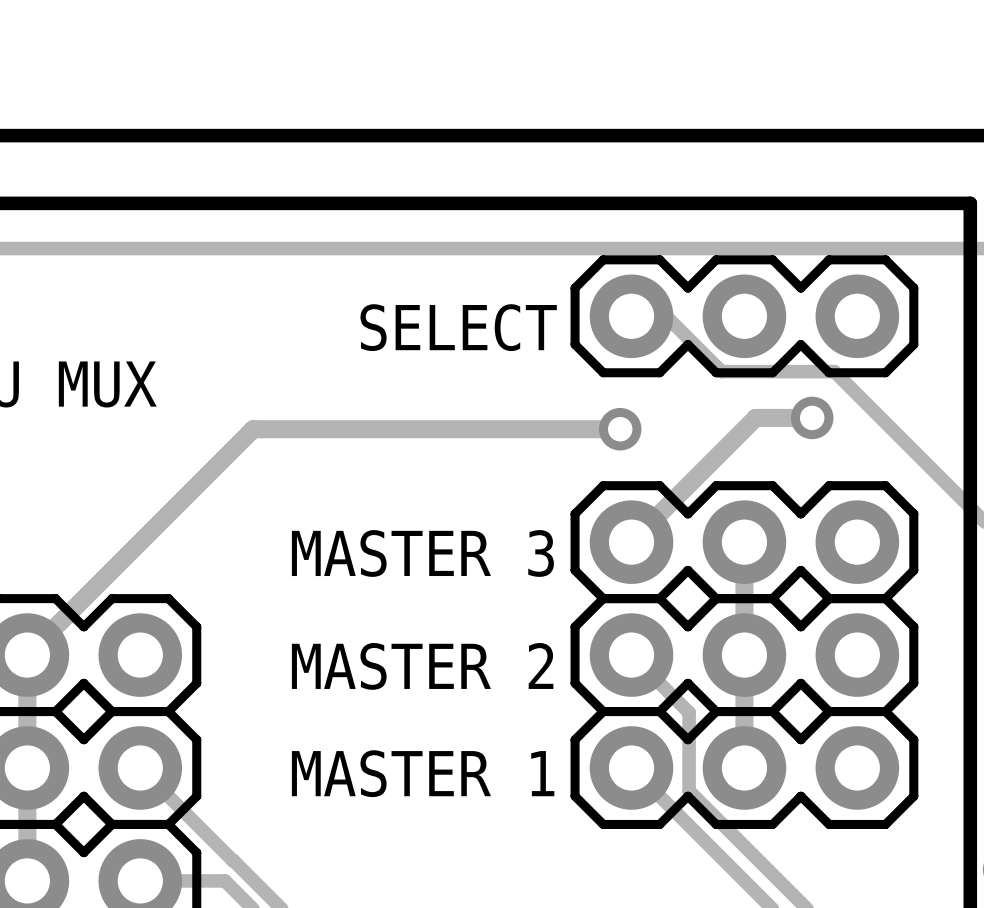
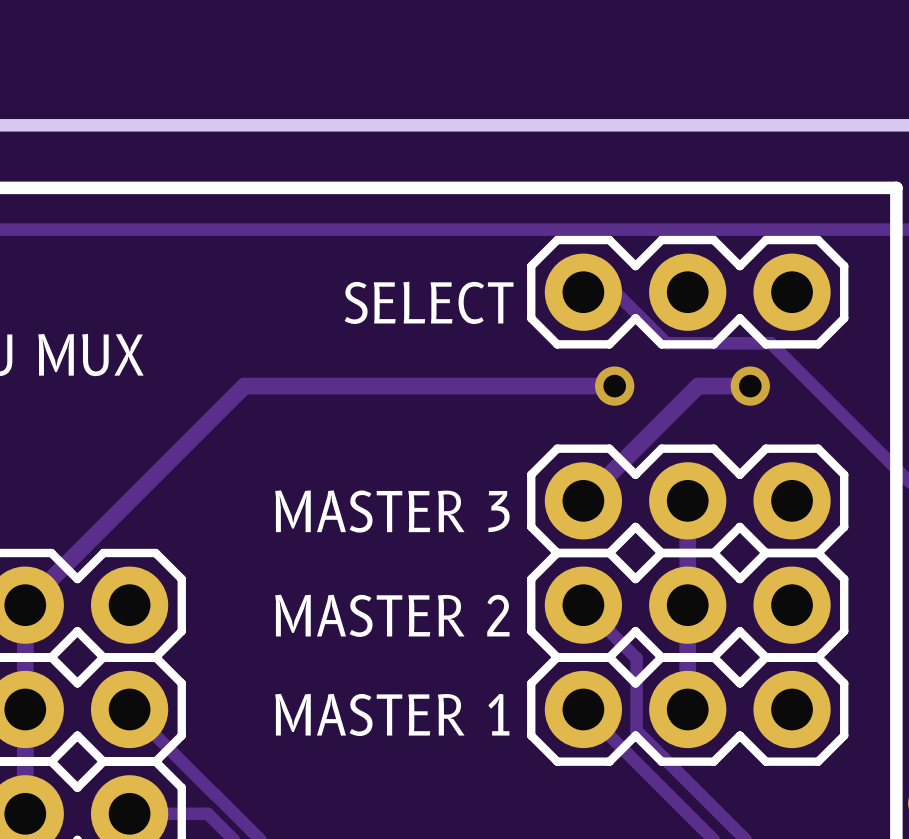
track: (253, 429) (620, 429) -> (233, 396) (244, 386) (614, 386)
via position: (620, 429) -> (614, 386)

